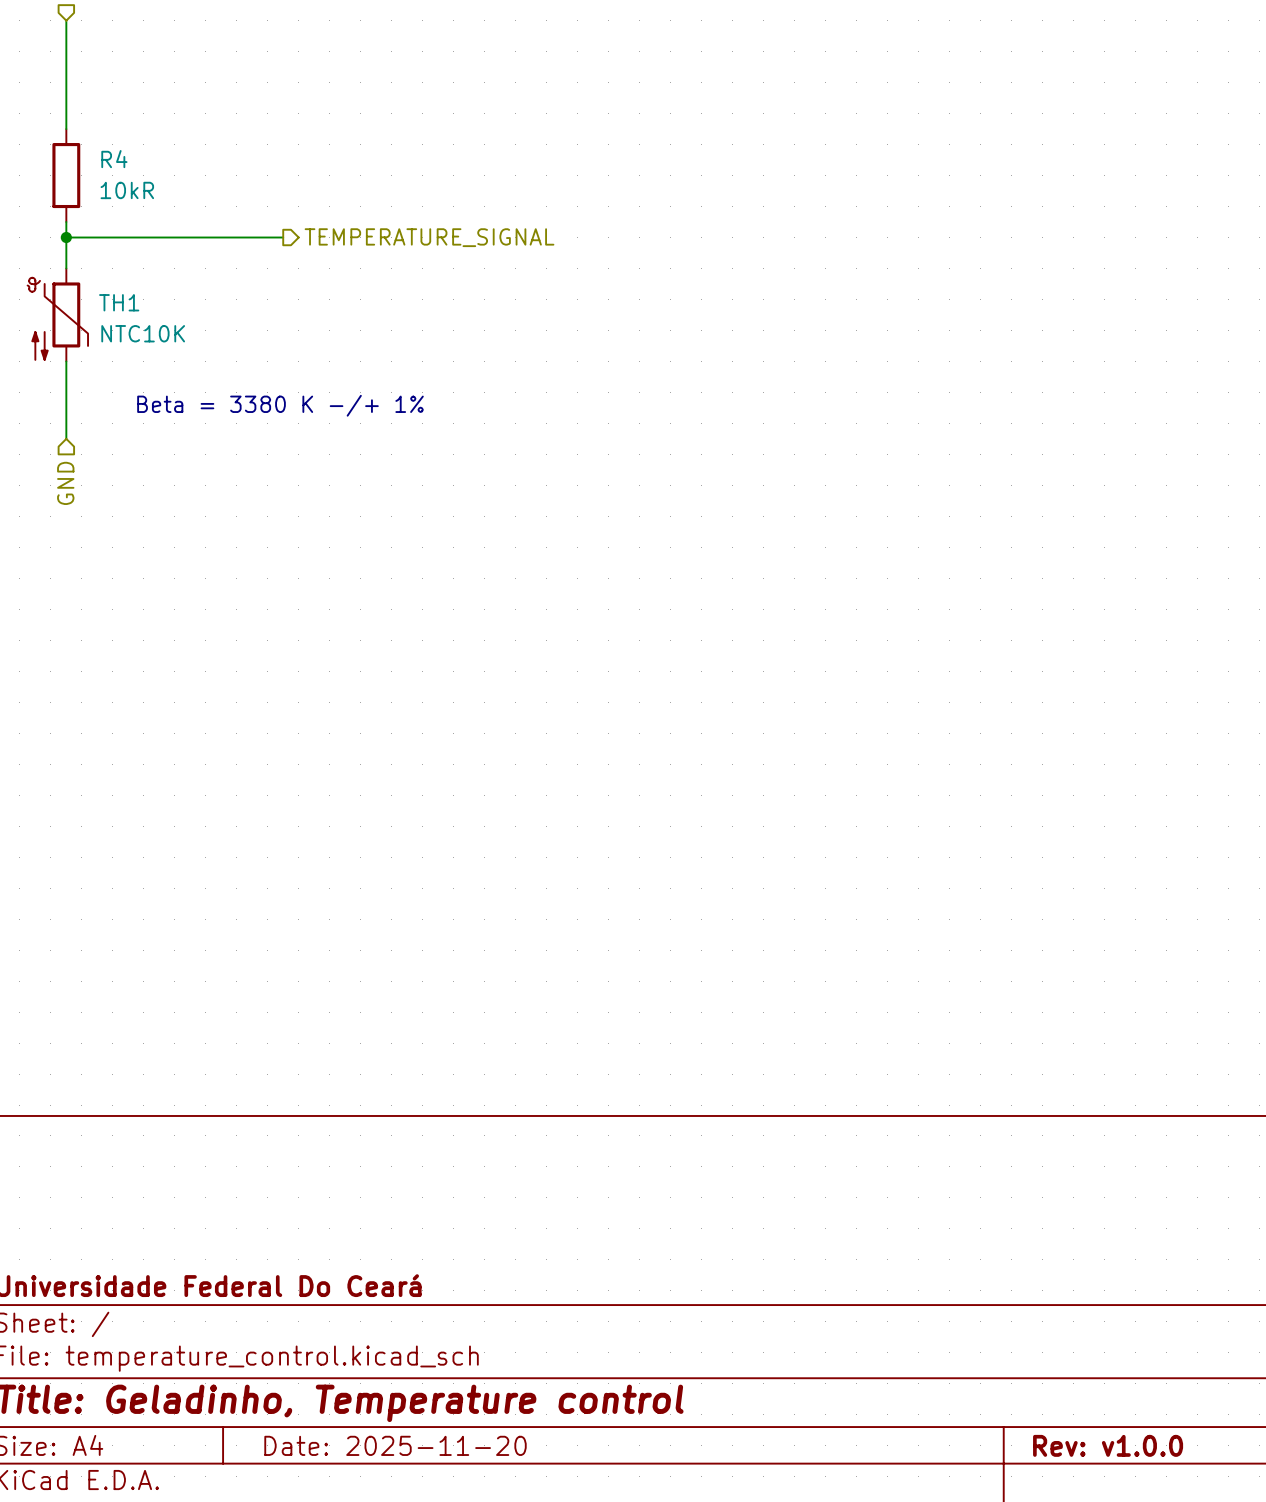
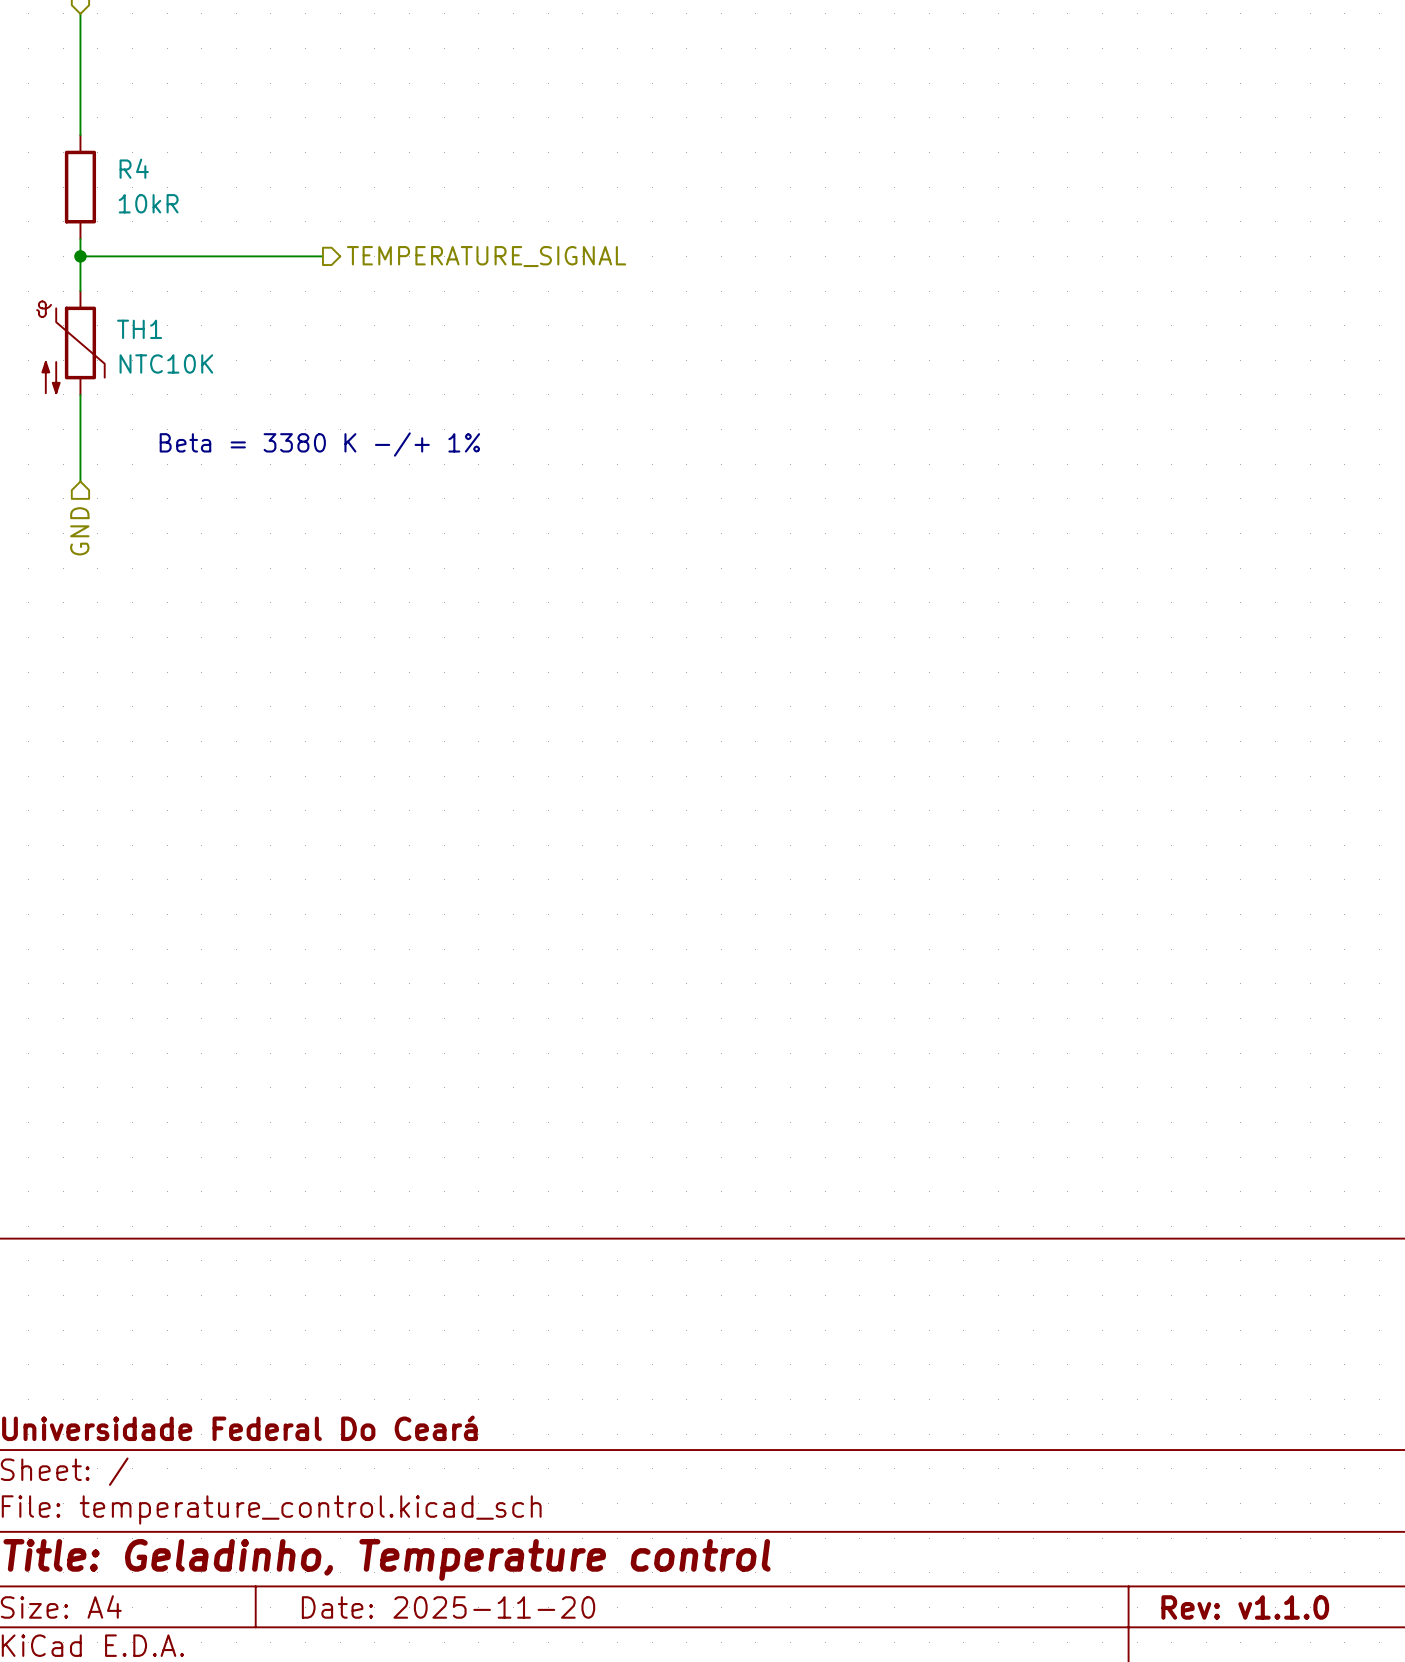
title block: Rev: v1.0.0 (1108, 1445) -> Rev: v1.1.0 (1245, 1607)

